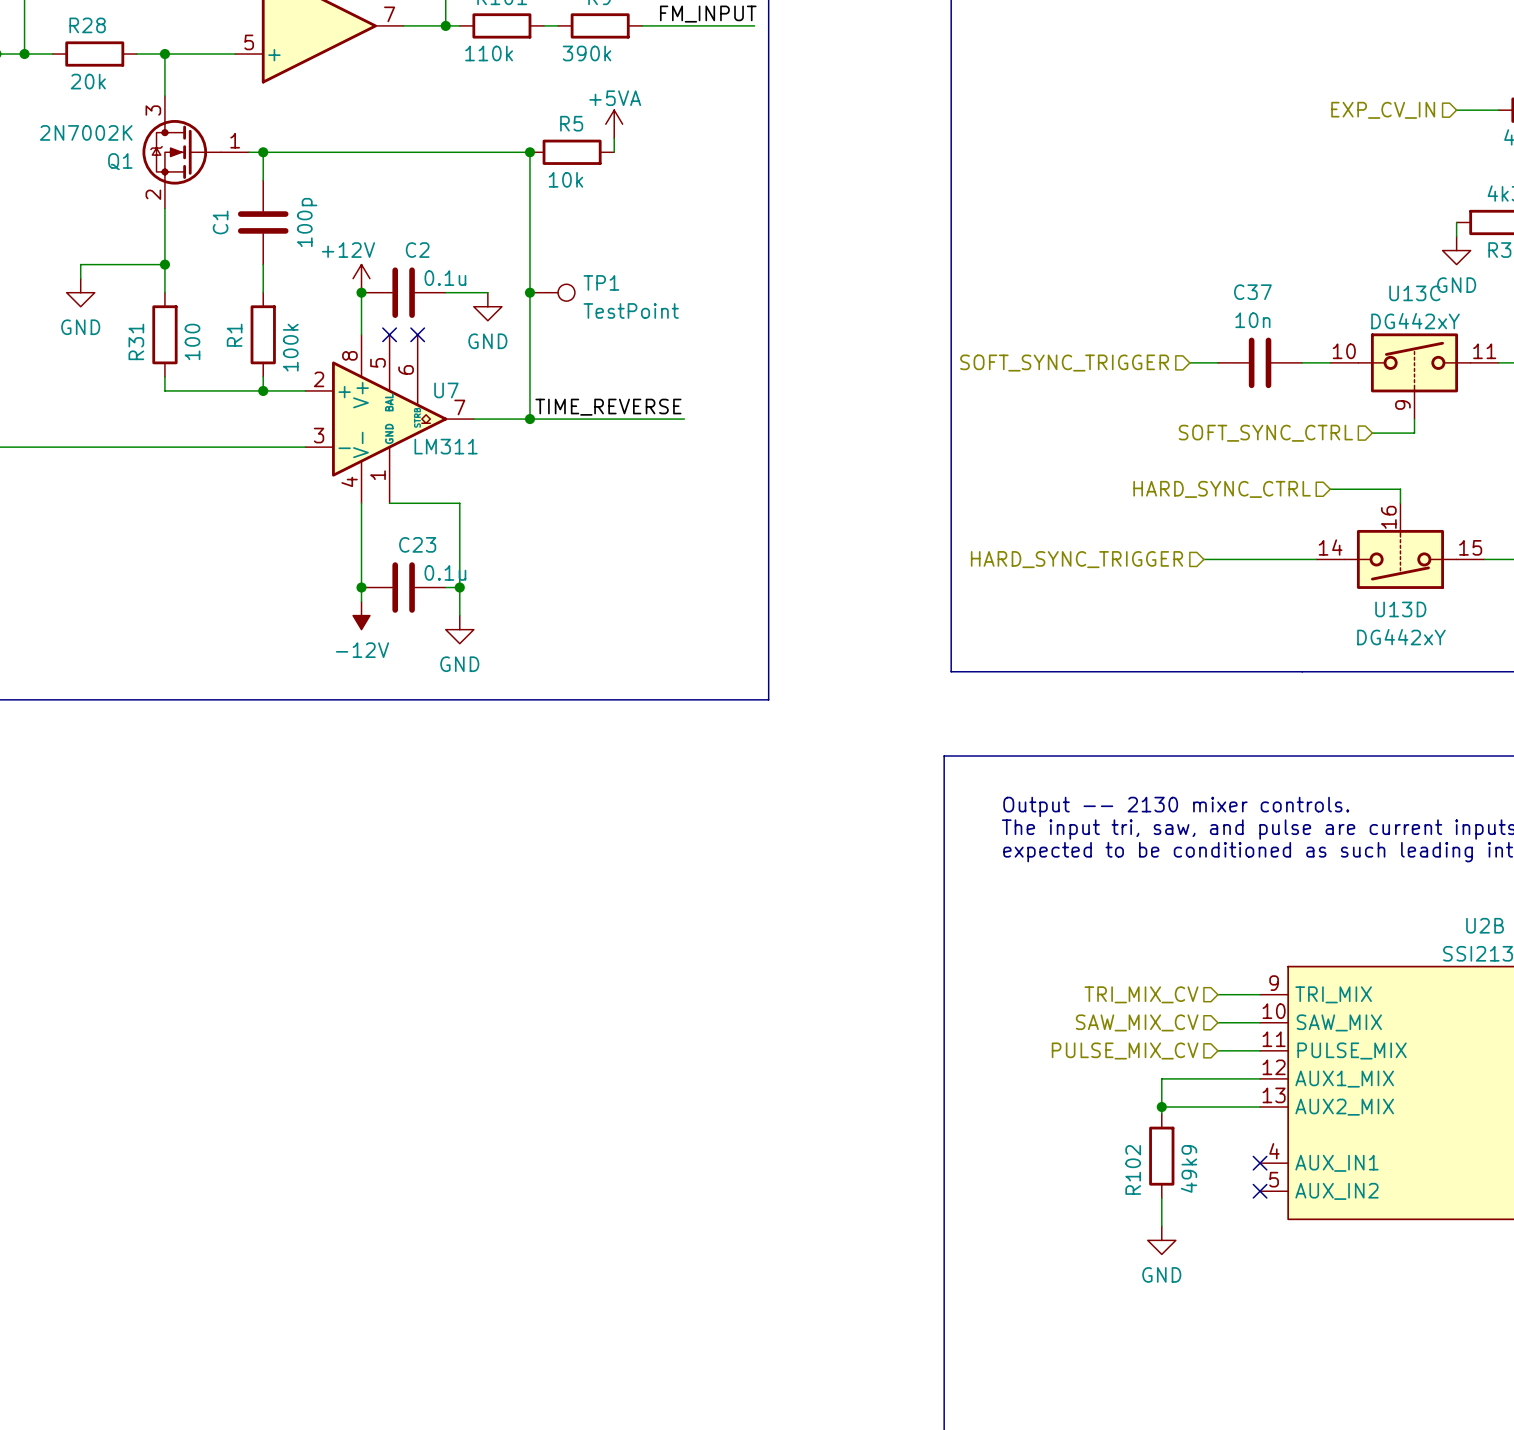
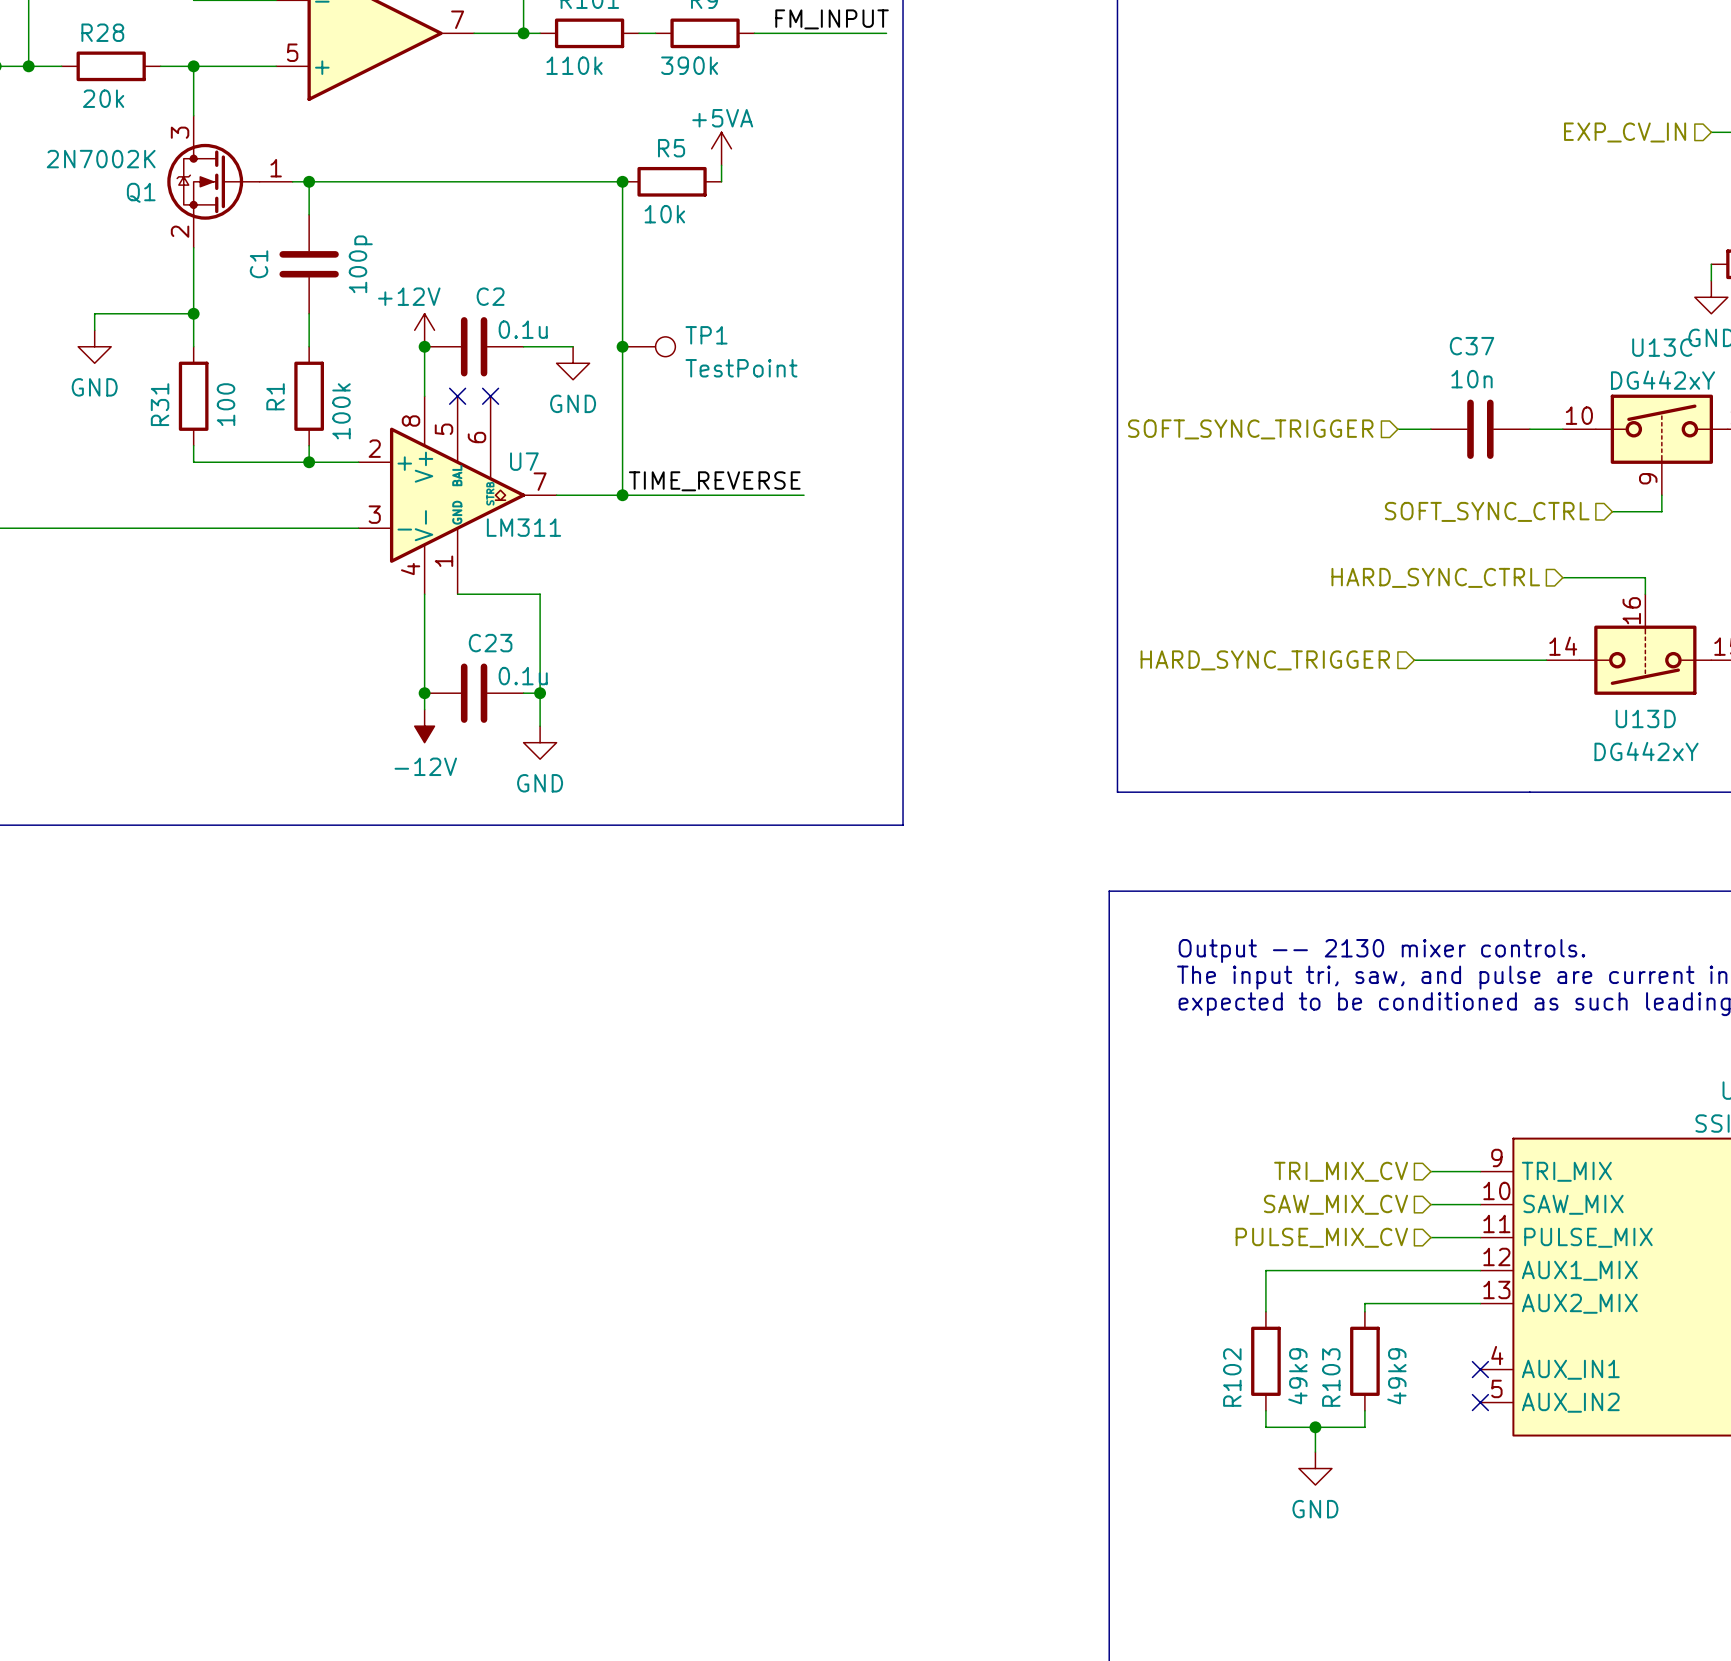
wire: (1161, 1078) (1161, 1107) -> (1364, 1270) (1265, 1270) (1265, 1311)
junction: (1161, 1107) -> none
R102: none -> 49k9 (1265, 1361)
R102 name: R102 (1133, 1169) -> R103 (1331, 1377)
wire: none -> (1315, 1427) (1315, 1452)
junction: none -> (1315, 1427)
wire: (1161, 1212) (1161, 1226) -> (1364, 1427) (1265, 1427) (1265, 1410)
power symbol position: GND (1161, 1240) -> GND (1315, 1468)

